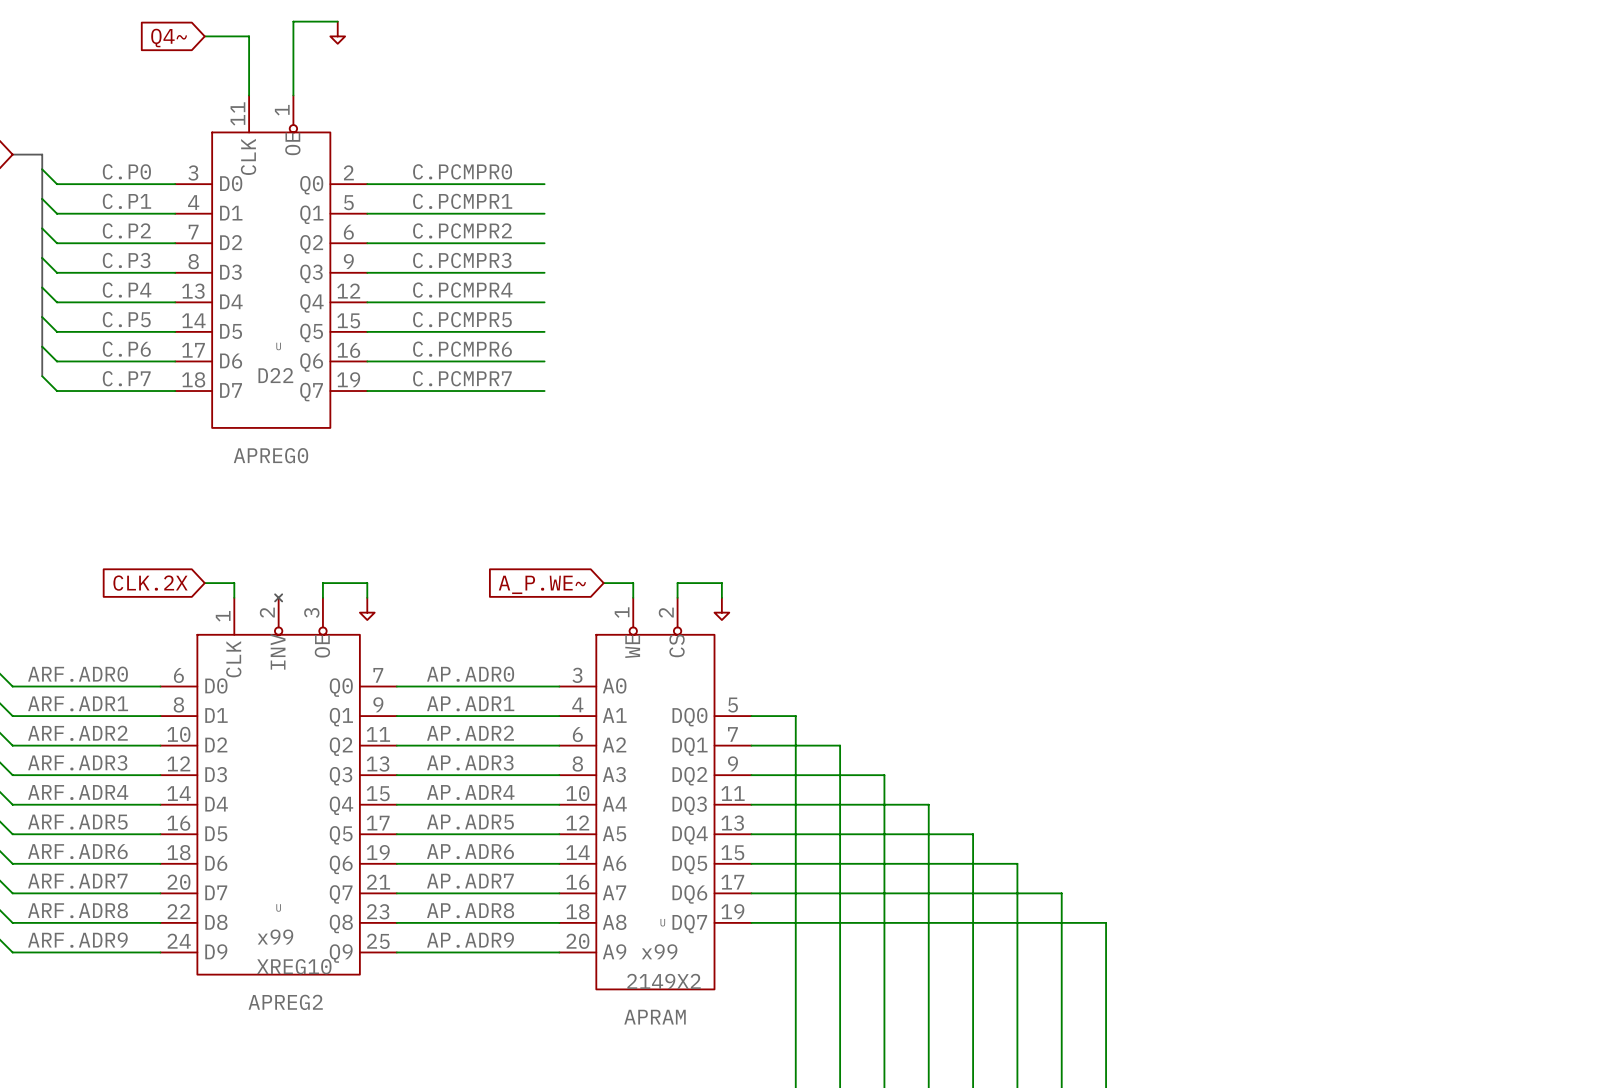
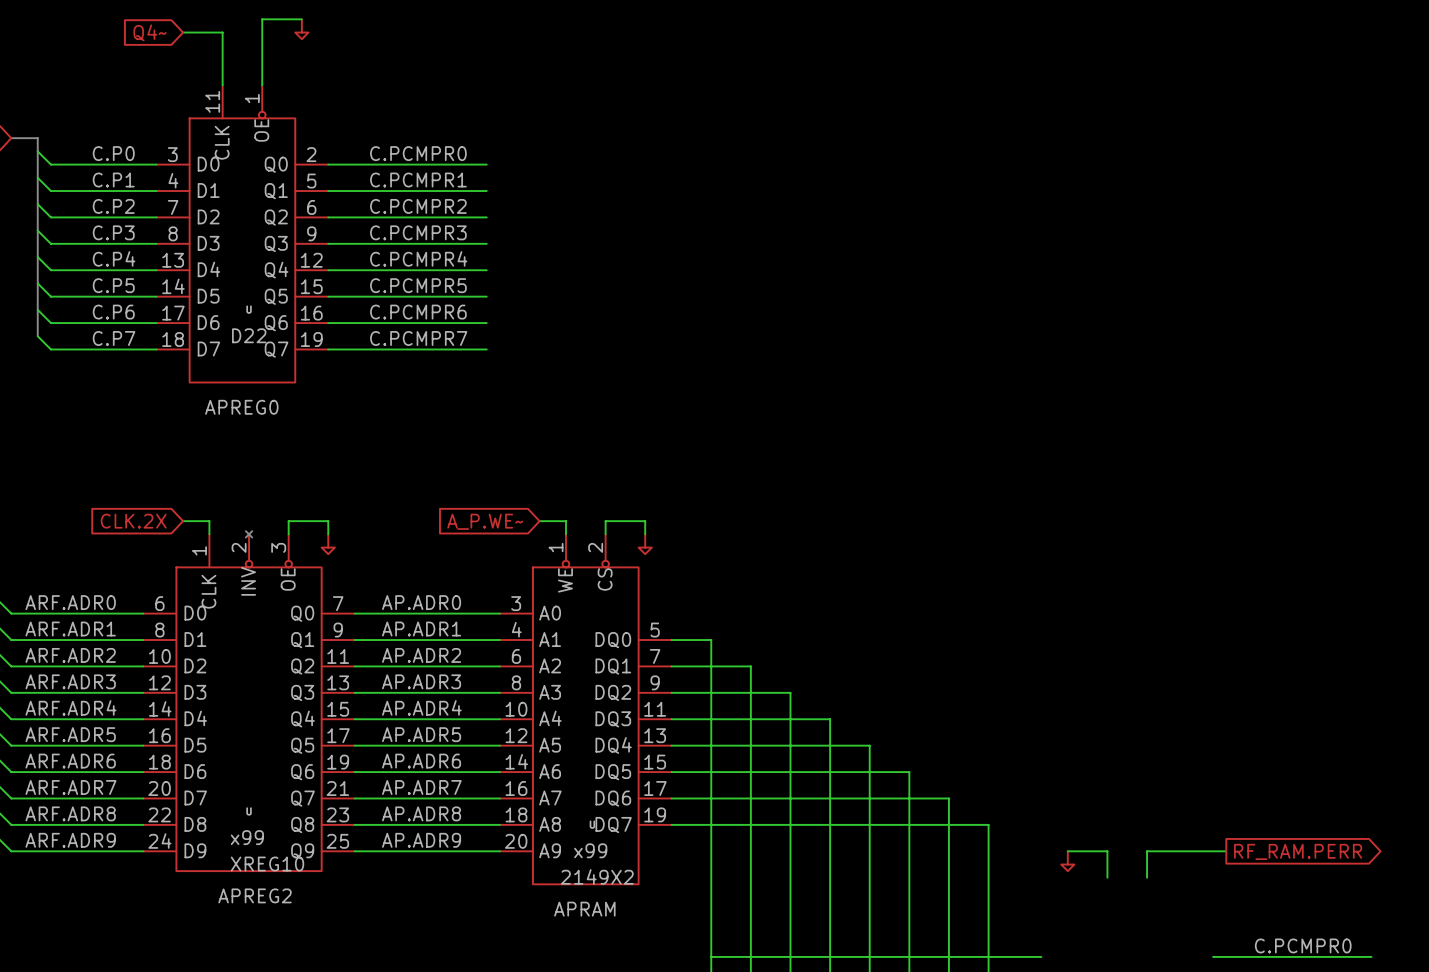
wire: none -> (1067, 851) (1107, 851) (1107, 877)
wire: none -> (1226, 851) (1147, 851) (1147, 877)
global label: none -> RF_RAM.PERR (1298, 851)
power symbol: none -> (1067, 861)
label: none -> C.PCMPR0 (1303, 945)
wire: none -> (711, 956) (1041, 956)
wire: none -> (1213, 956) (1371, 956)

